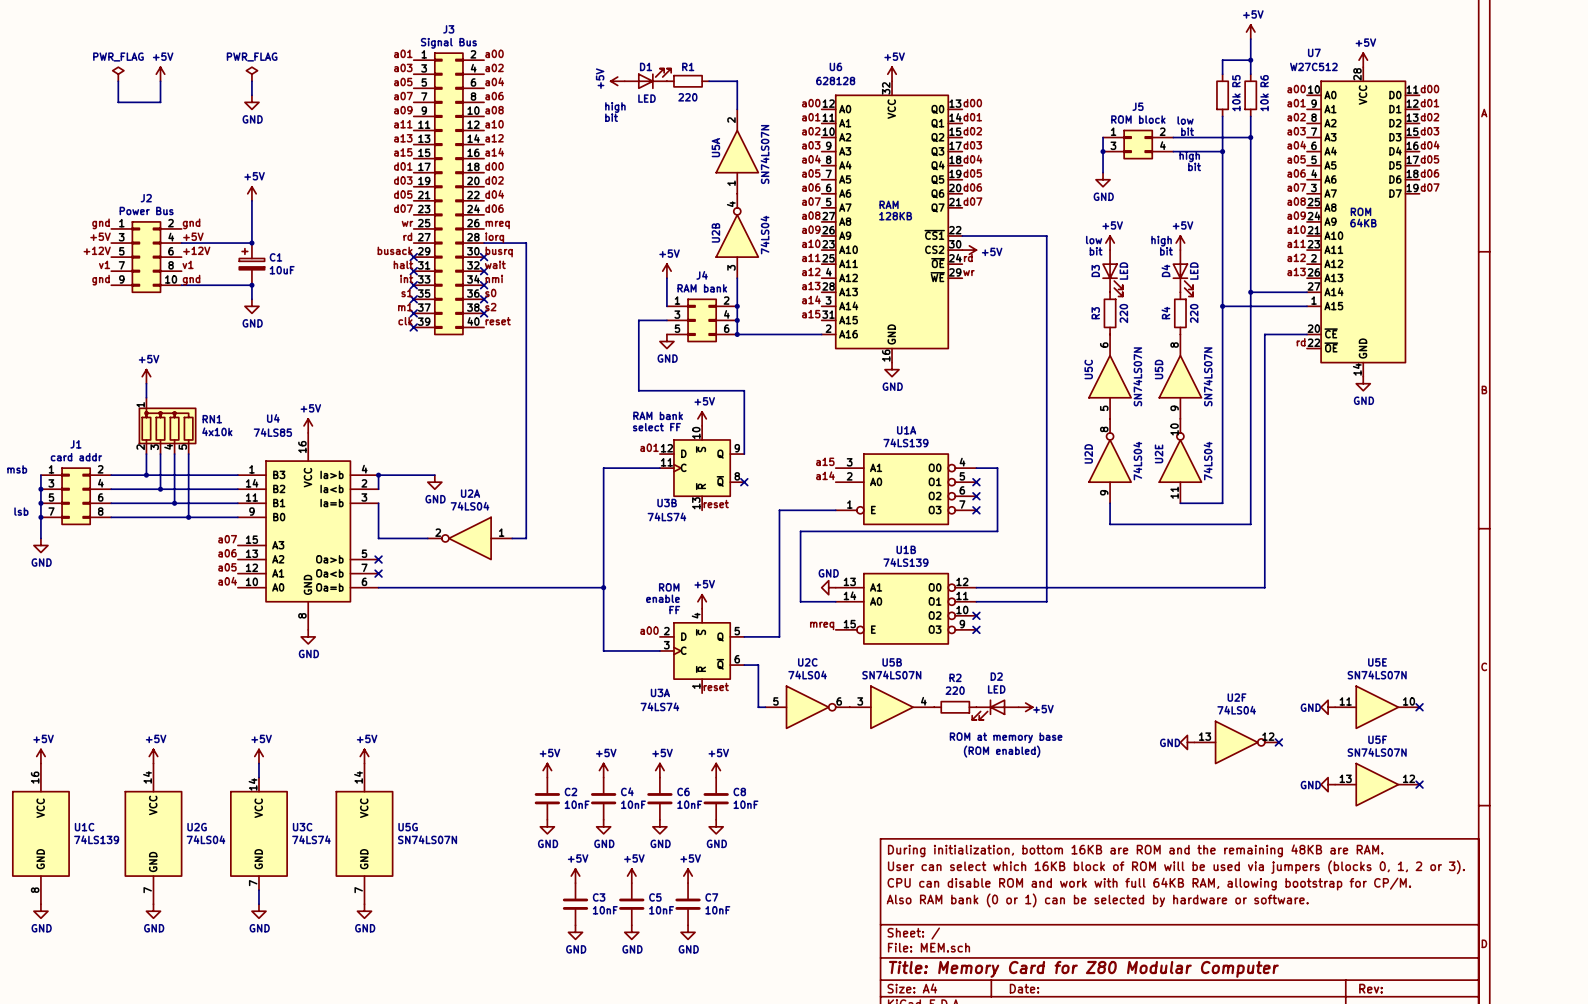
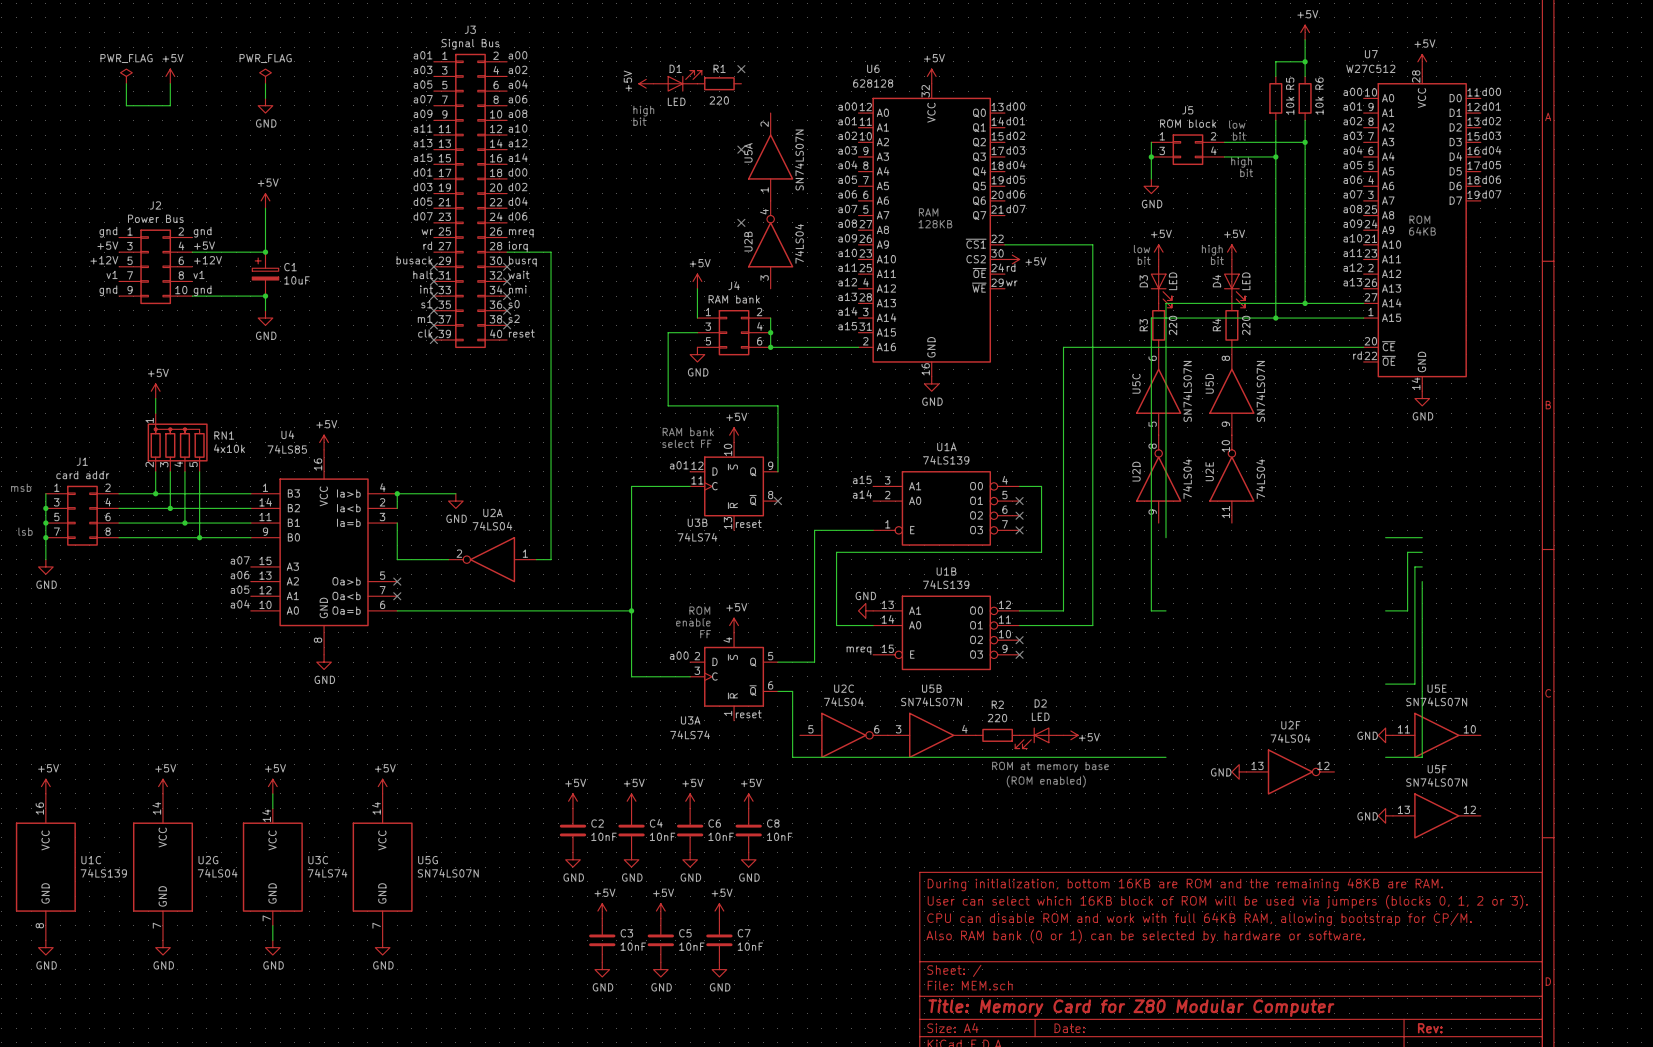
no-connect mark: none -> (741, 69)
wire: (709, 81) (737, 81) (737, 109) -> none
no-connect mark: none -> (741, 149)
no-connect mark: none -> (741, 222)
wire: (737, 278) (737, 306) -> none
wire: (1250, 292) (1250, 524) (1110, 524) (1110, 503) -> (1305, 303) (1166, 303) (1166, 537)
junction: (737, 306) -> none
wire: (1222, 306) (1222, 503) (1180, 503) -> (1275, 318) (1151, 318) (1151, 610)
wire: (1264, 334) (1264, 587) (1117, 587) -> (1319, 347) (1063, 347) (1063, 610)
wire: none -> (1385, 537) (1422, 537)
wire: none -> (1422, 552) (1407, 552) (1407, 610) (1385, 610)
wire: none -> (1422, 566) (1414, 566) (1414, 684) (1385, 684)
wire: none -> (1422, 581) (1422, 757) (1385, 757)
wire: (1018, 587) (1103, 587) -> none
wire: (758, 707) (765, 707) -> (792, 735) (792, 757) (1166, 757)
no-connect mark: (1419, 707) -> none
no-connect mark: (1278, 742) -> none
no-connect mark: (1419, 784) -> none

